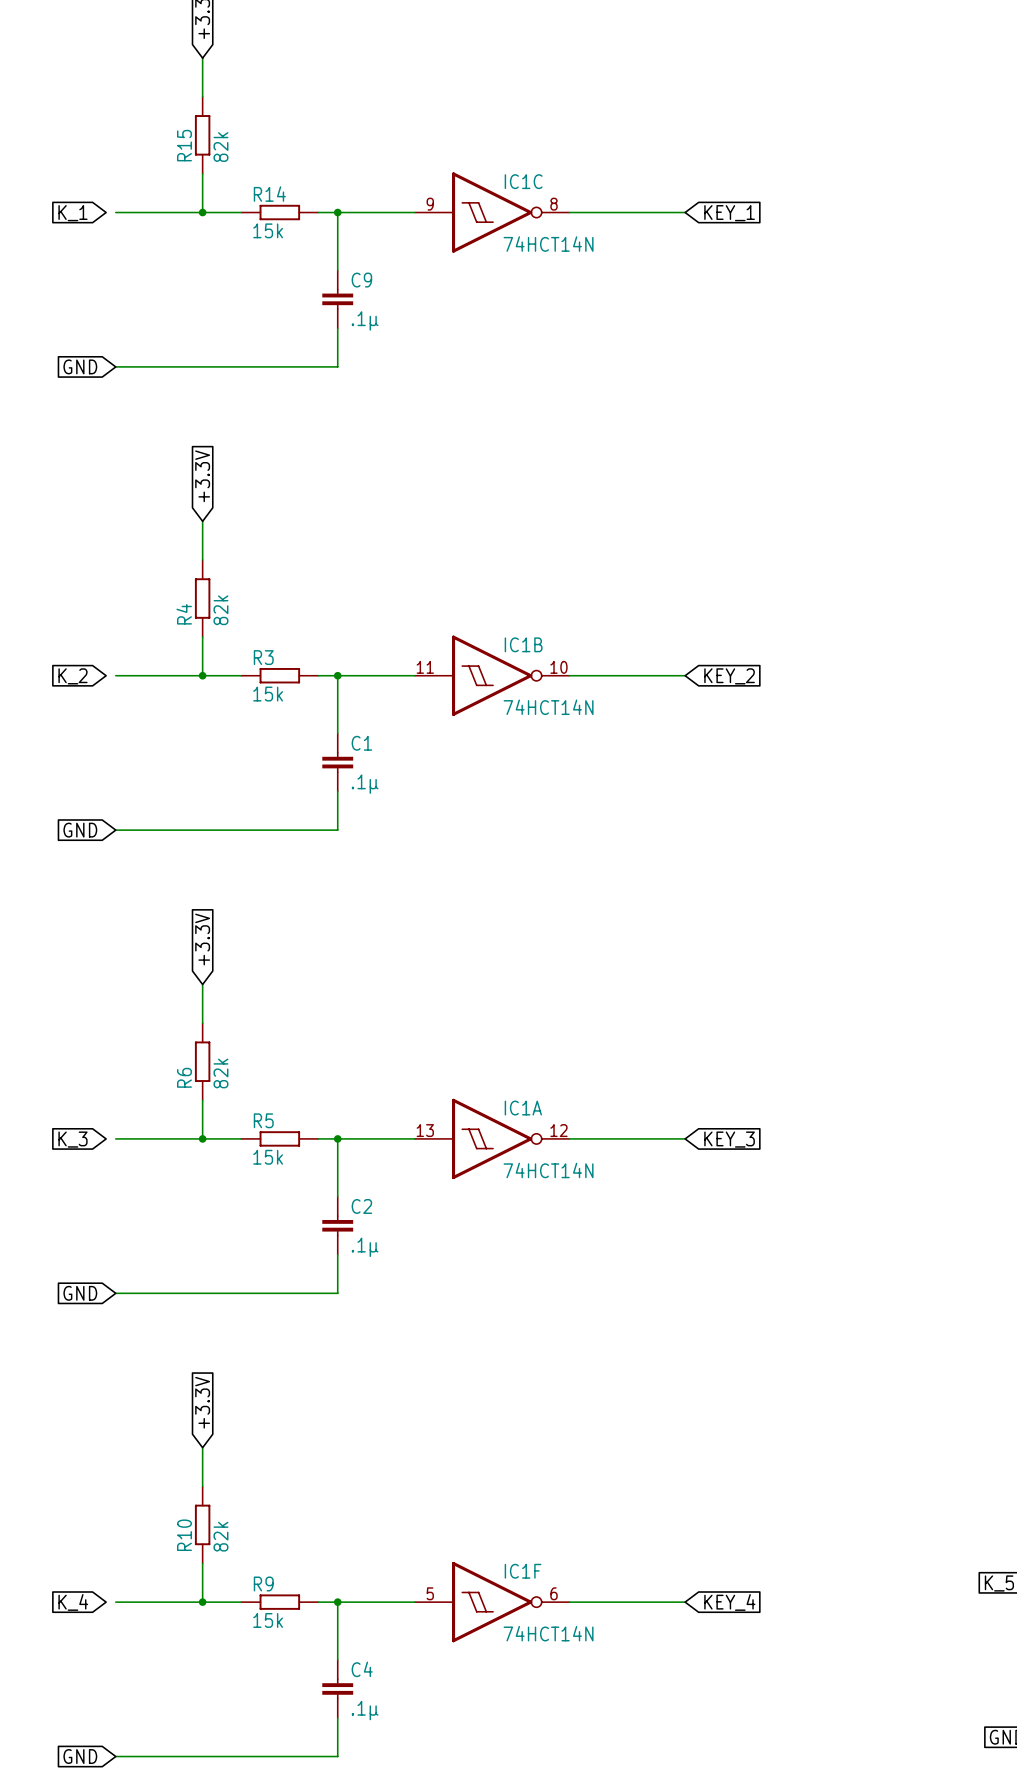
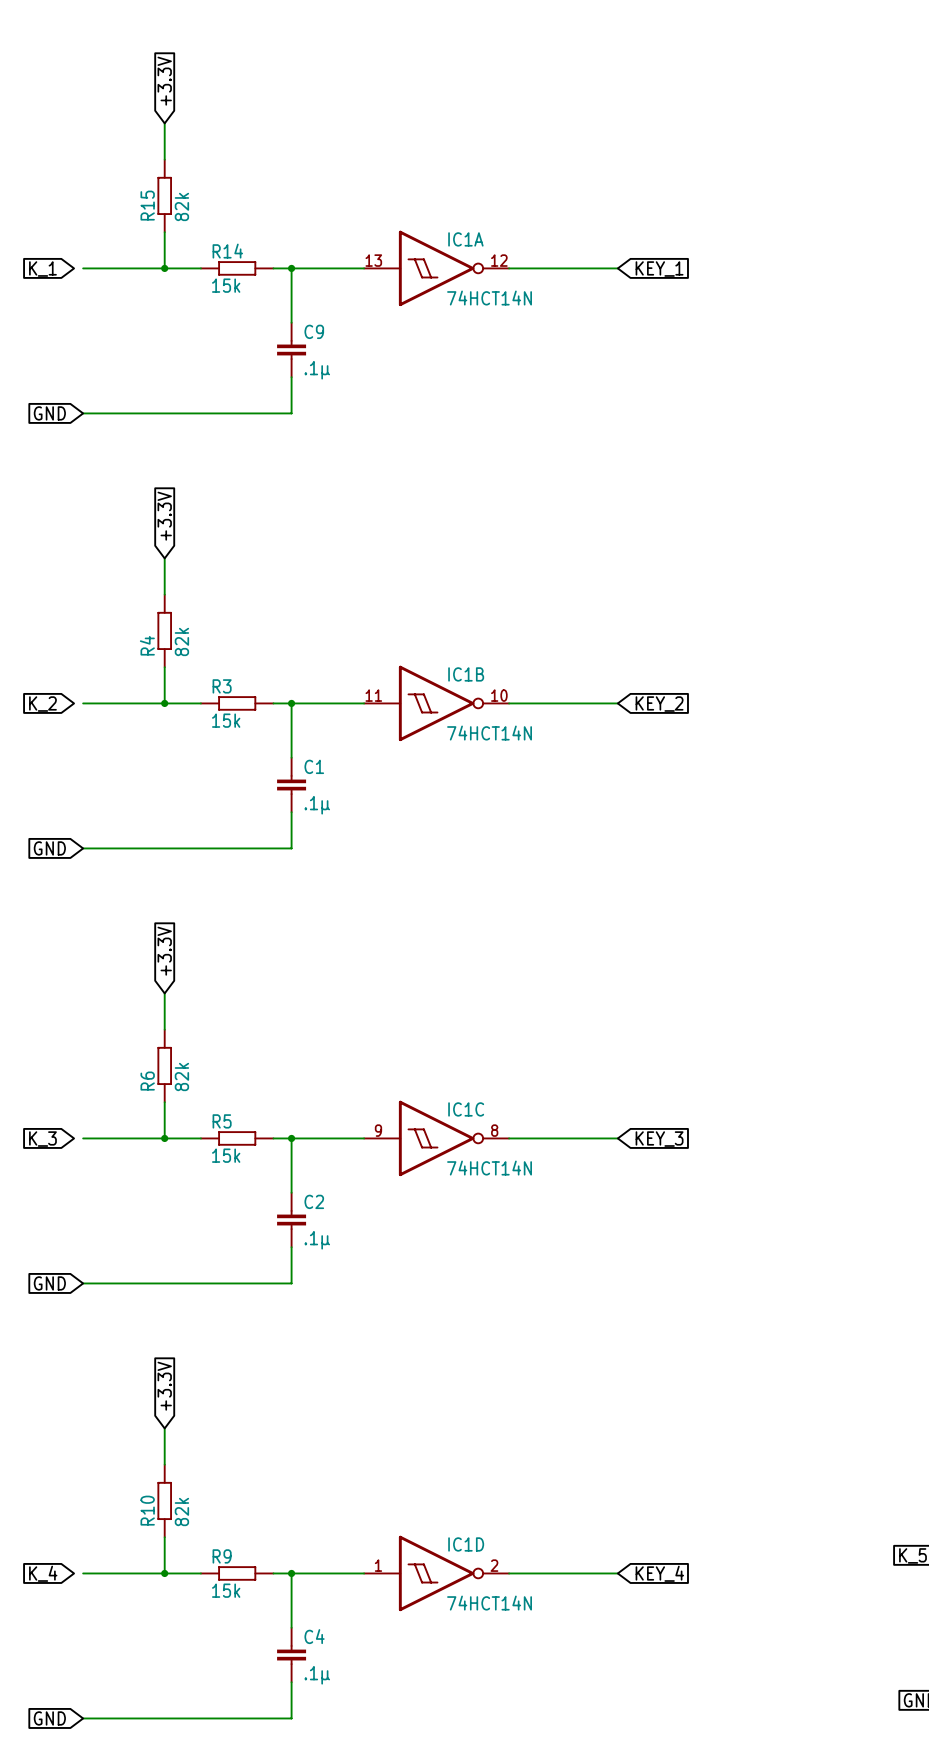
IC1C position: (492, 212) -> (436, 1138)
IC1A position: (492, 1138) -> (436, 268)
IC1F name: IC1F (523, 1571) -> IC1D (466, 1544)
IC1F pin number: 5 (430, 1593) -> 1 (378, 1565)
IC1F pin number: 6 (554, 1593) -> 2 (494, 1565)

